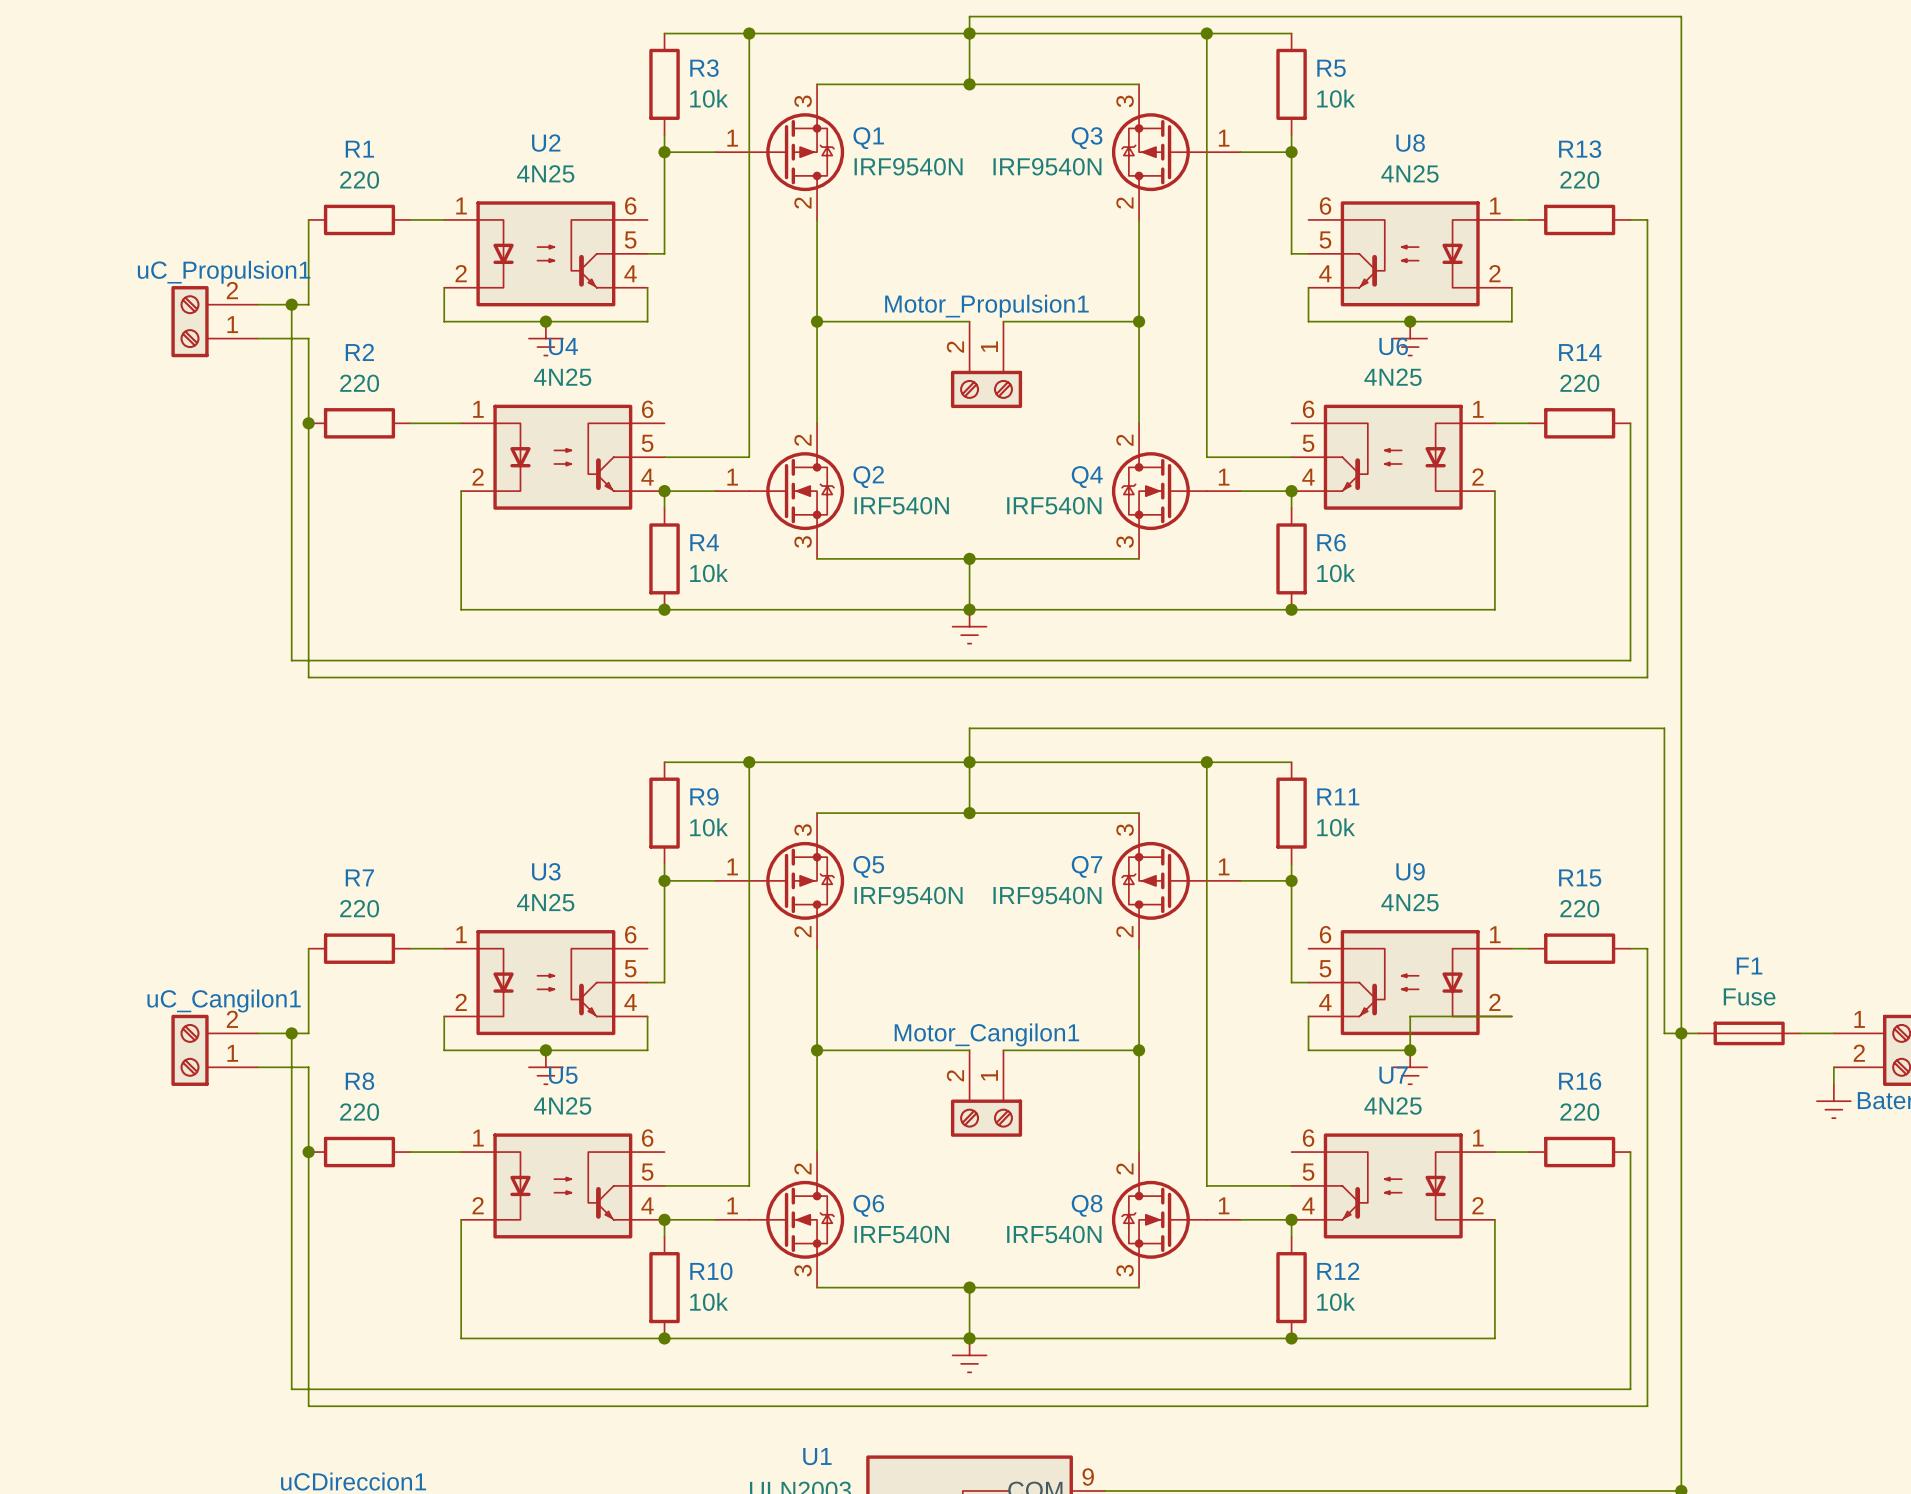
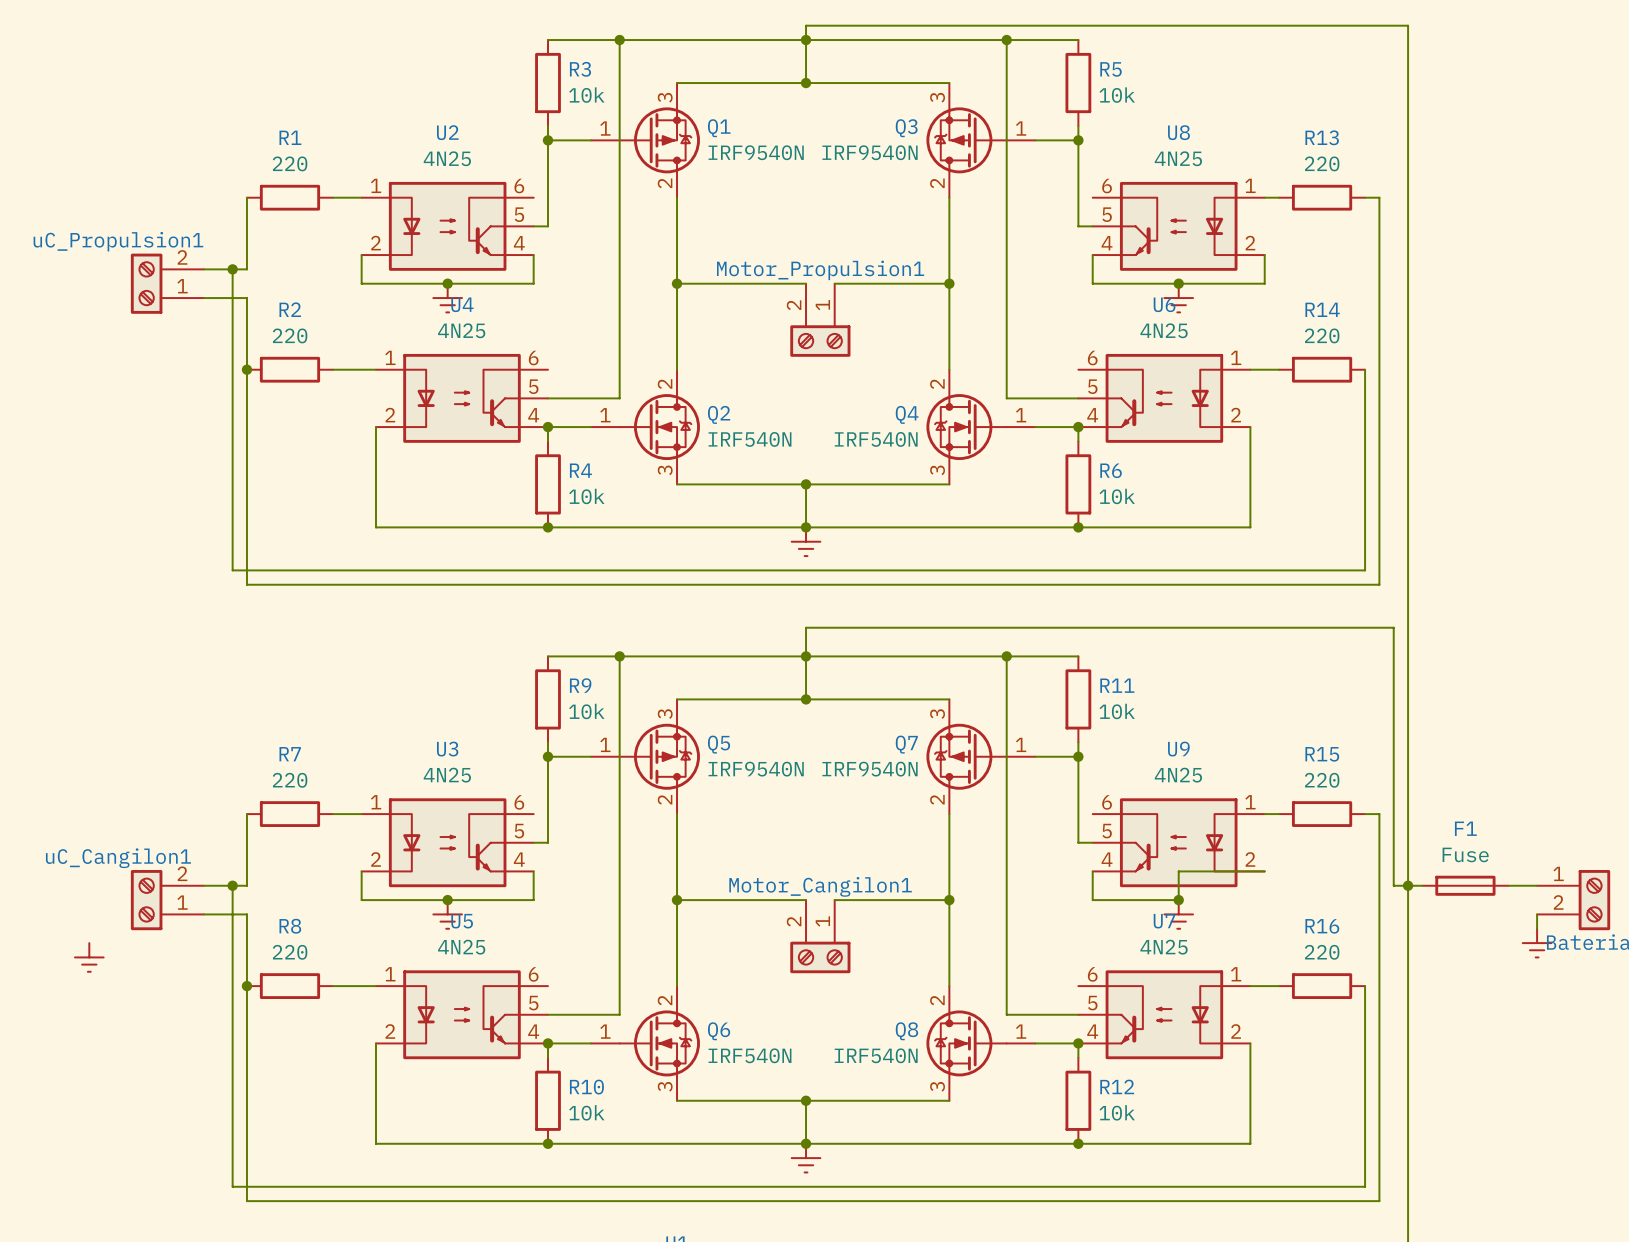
uC_Propulsion1 name position: uC_Propulsion1 (224, 272) -> uC_Propulsion1 (118, 241)
uC_Cangilon1 name position: uC_Cangilon1 (224, 1000) -> uC_Cangilon1 (118, 858)
power symbol: none -> (89, 957)

